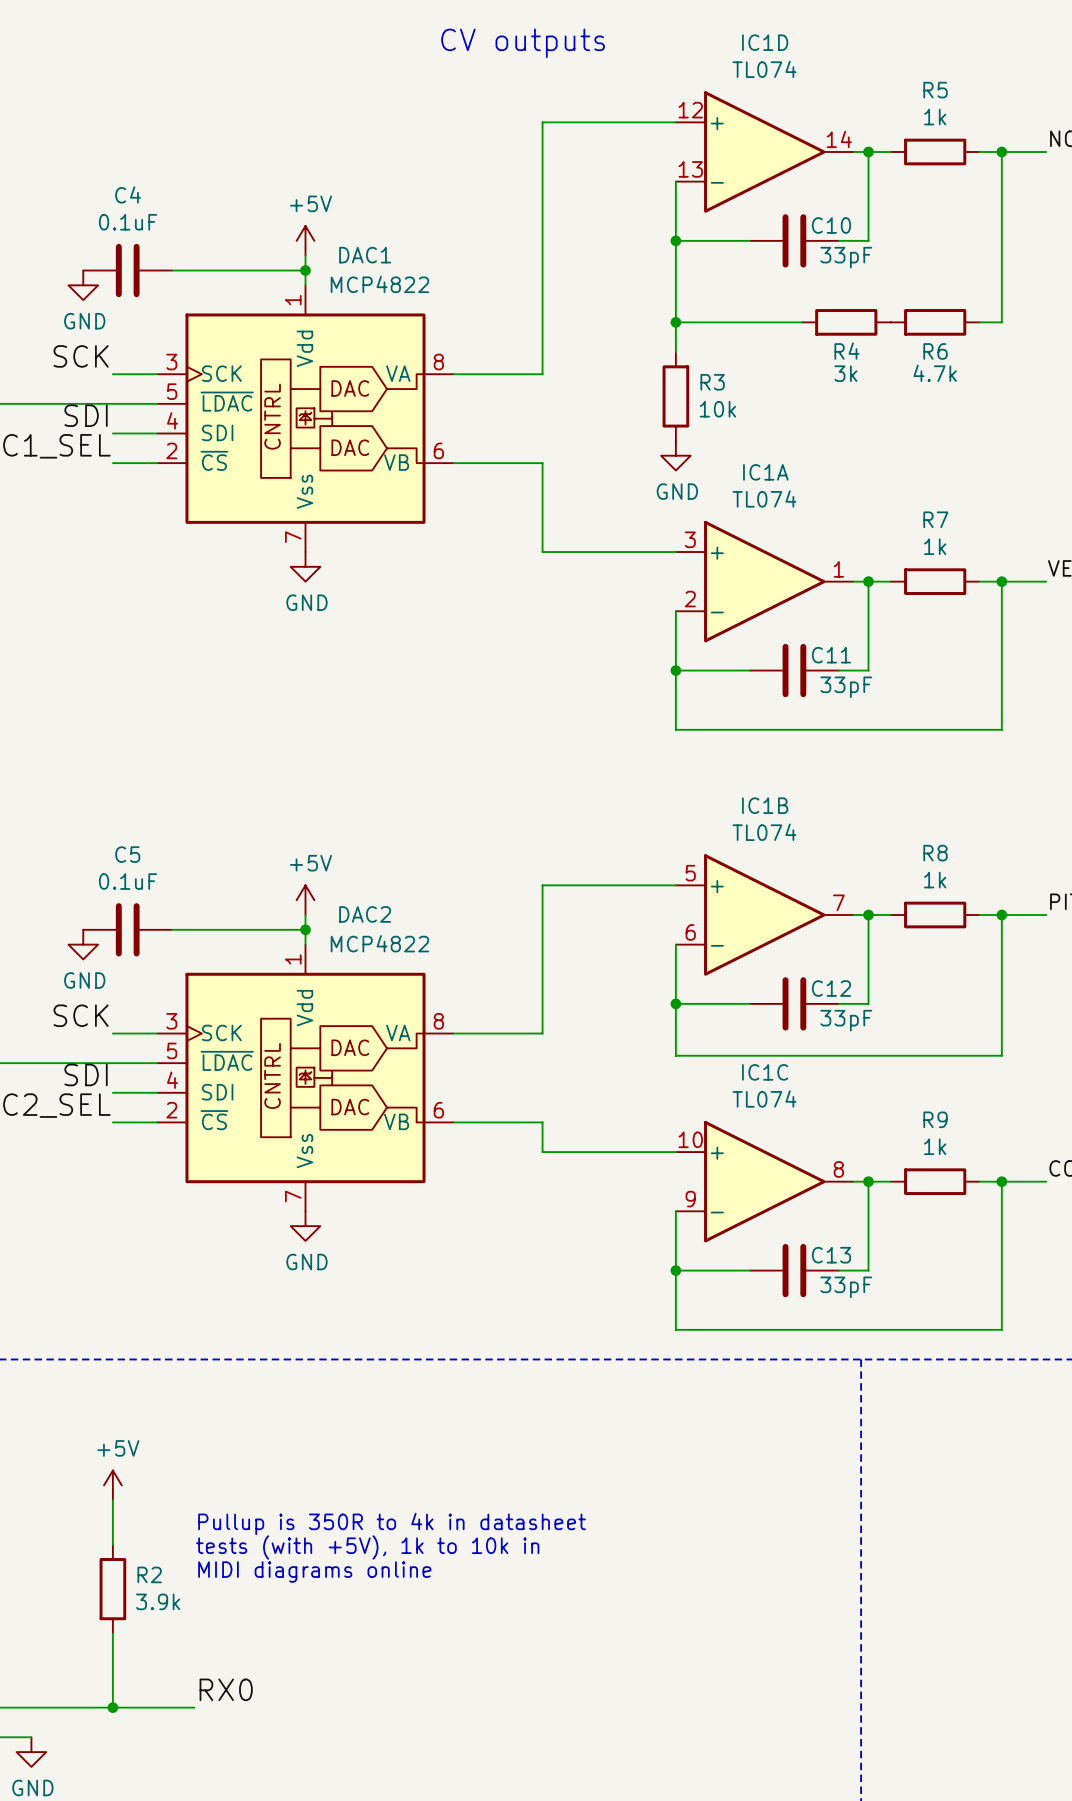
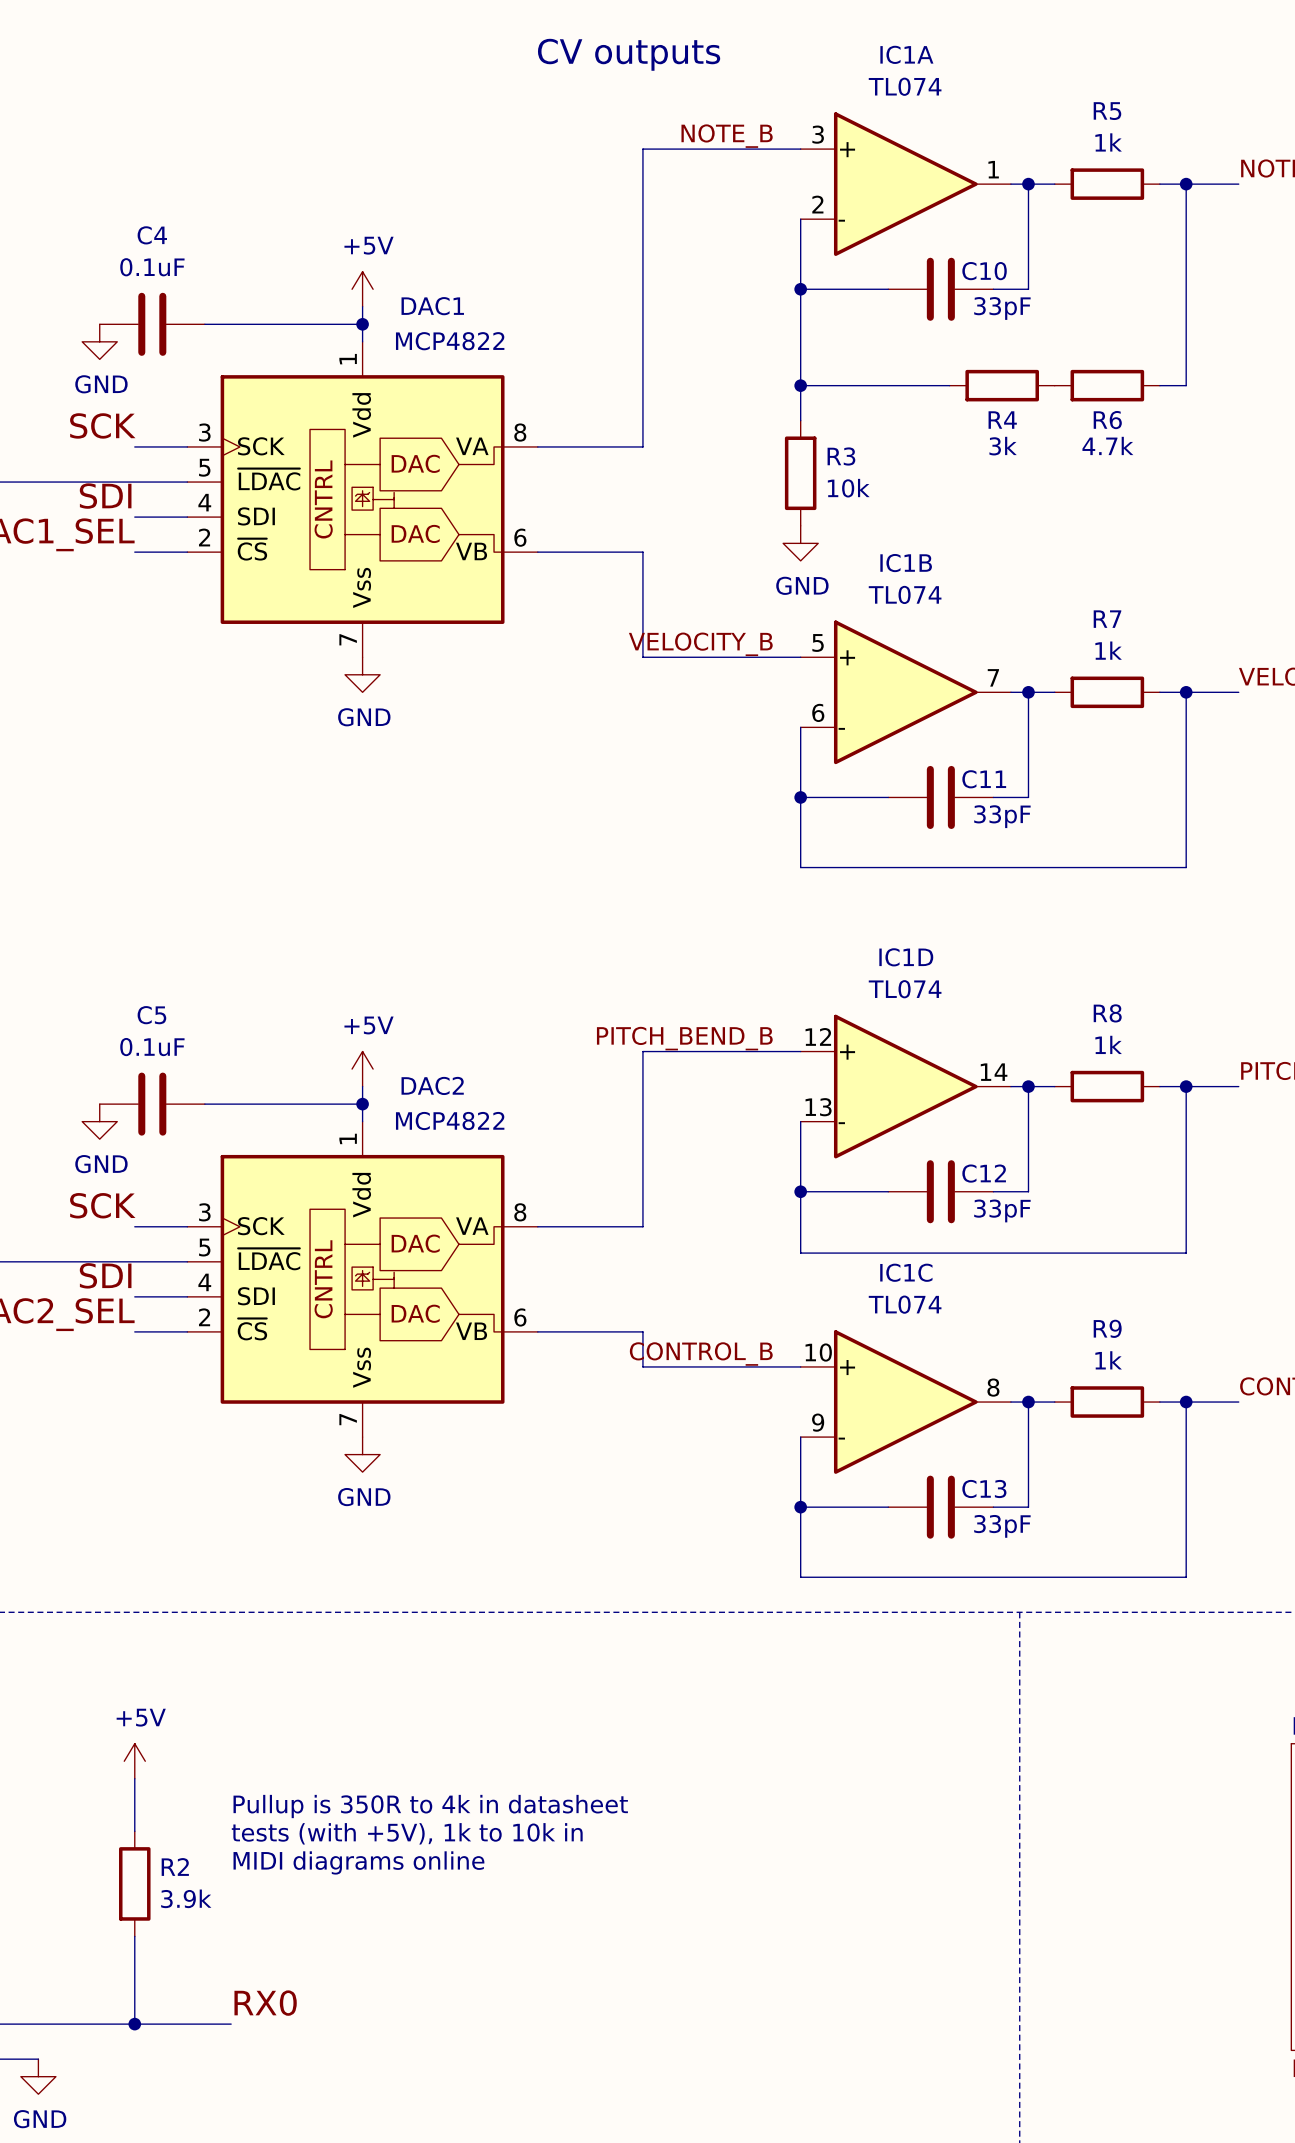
label: none -> NOTE_B (727, 136)
IC1D position: (764, 151) -> (905, 1086)
label: none -> VELOCITY_B (700, 644)
IC1A position: (764, 581) -> (905, 184)
label: none -> PITCH_BEND_B (684, 1038)
IC1B position: (764, 915) -> (905, 692)
label: none -> CONTROL_B (701, 1354)

